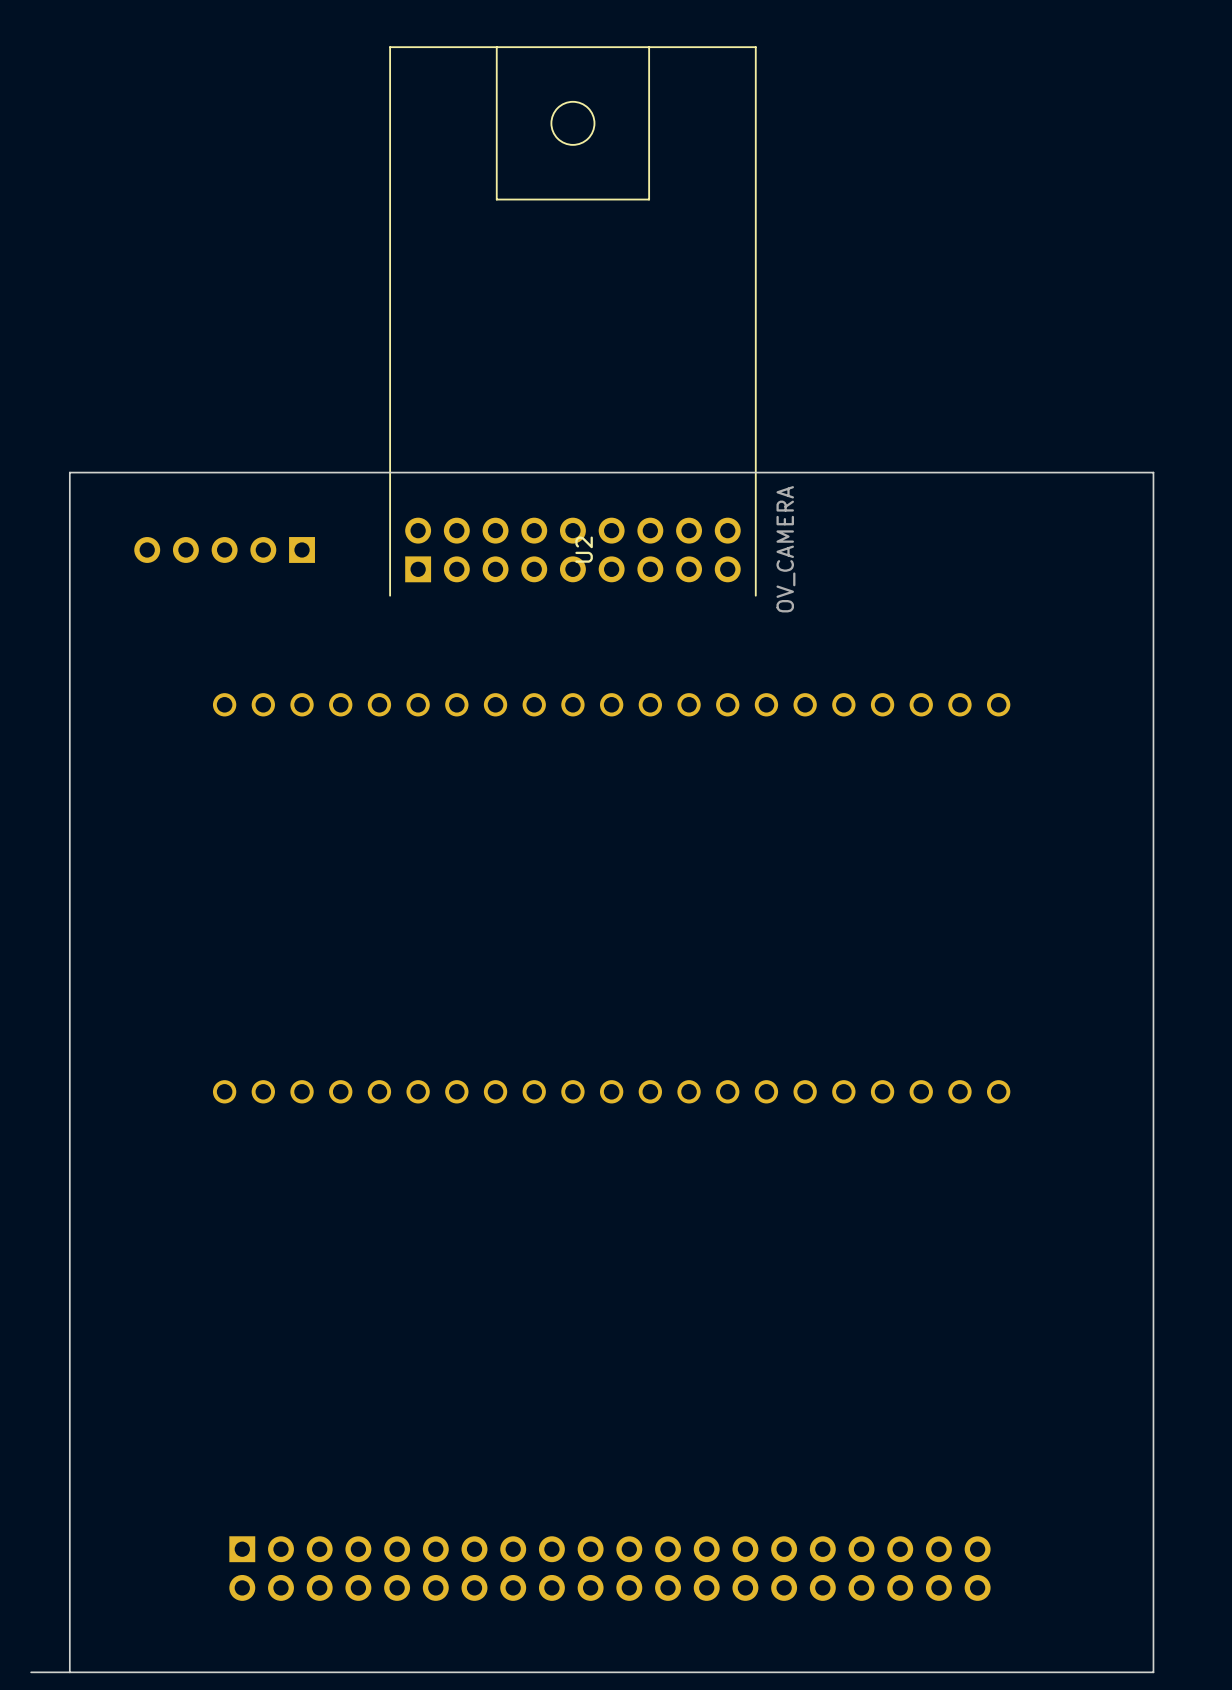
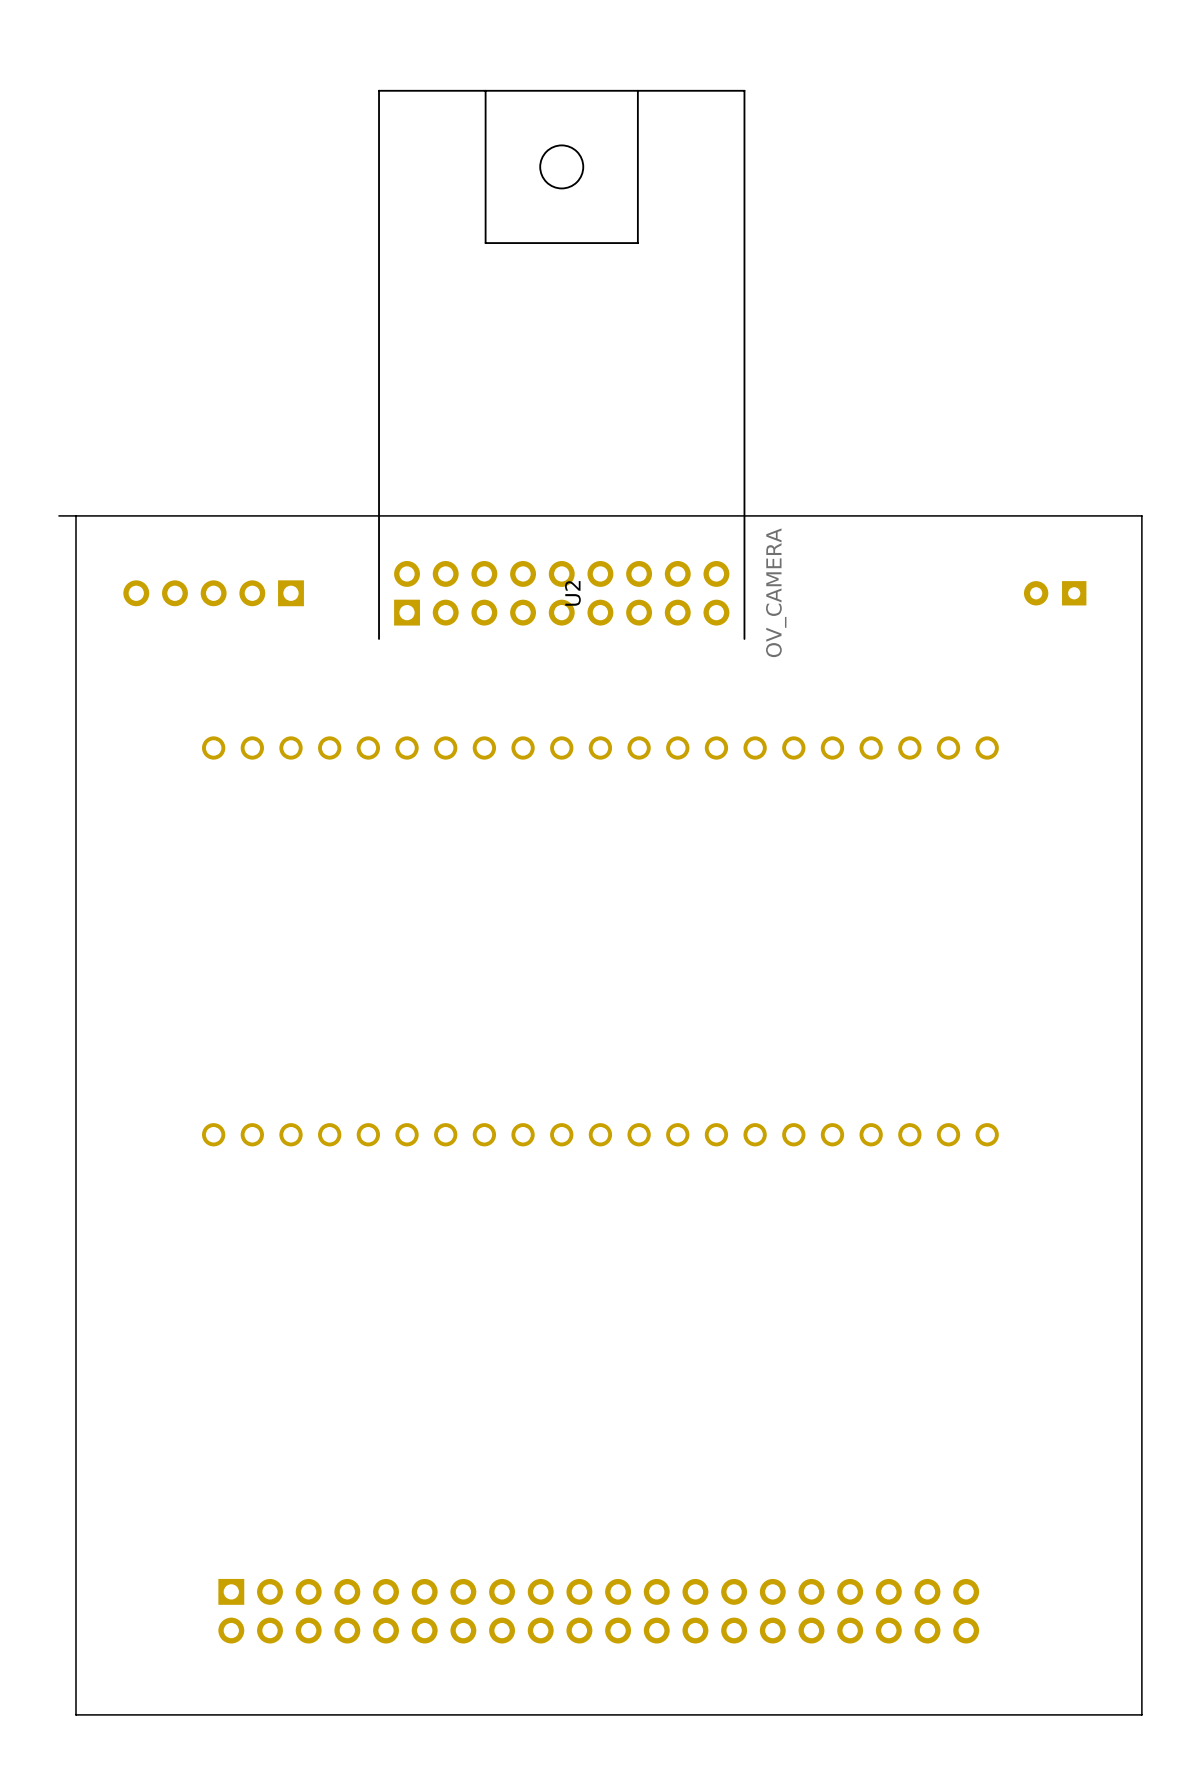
board edge: (69, 472) (69, 1672) -> none
part: none -> (1055, 593)
board edge: (86, 1672) (31, 1672) -> (75, 1714) (75, 515)

